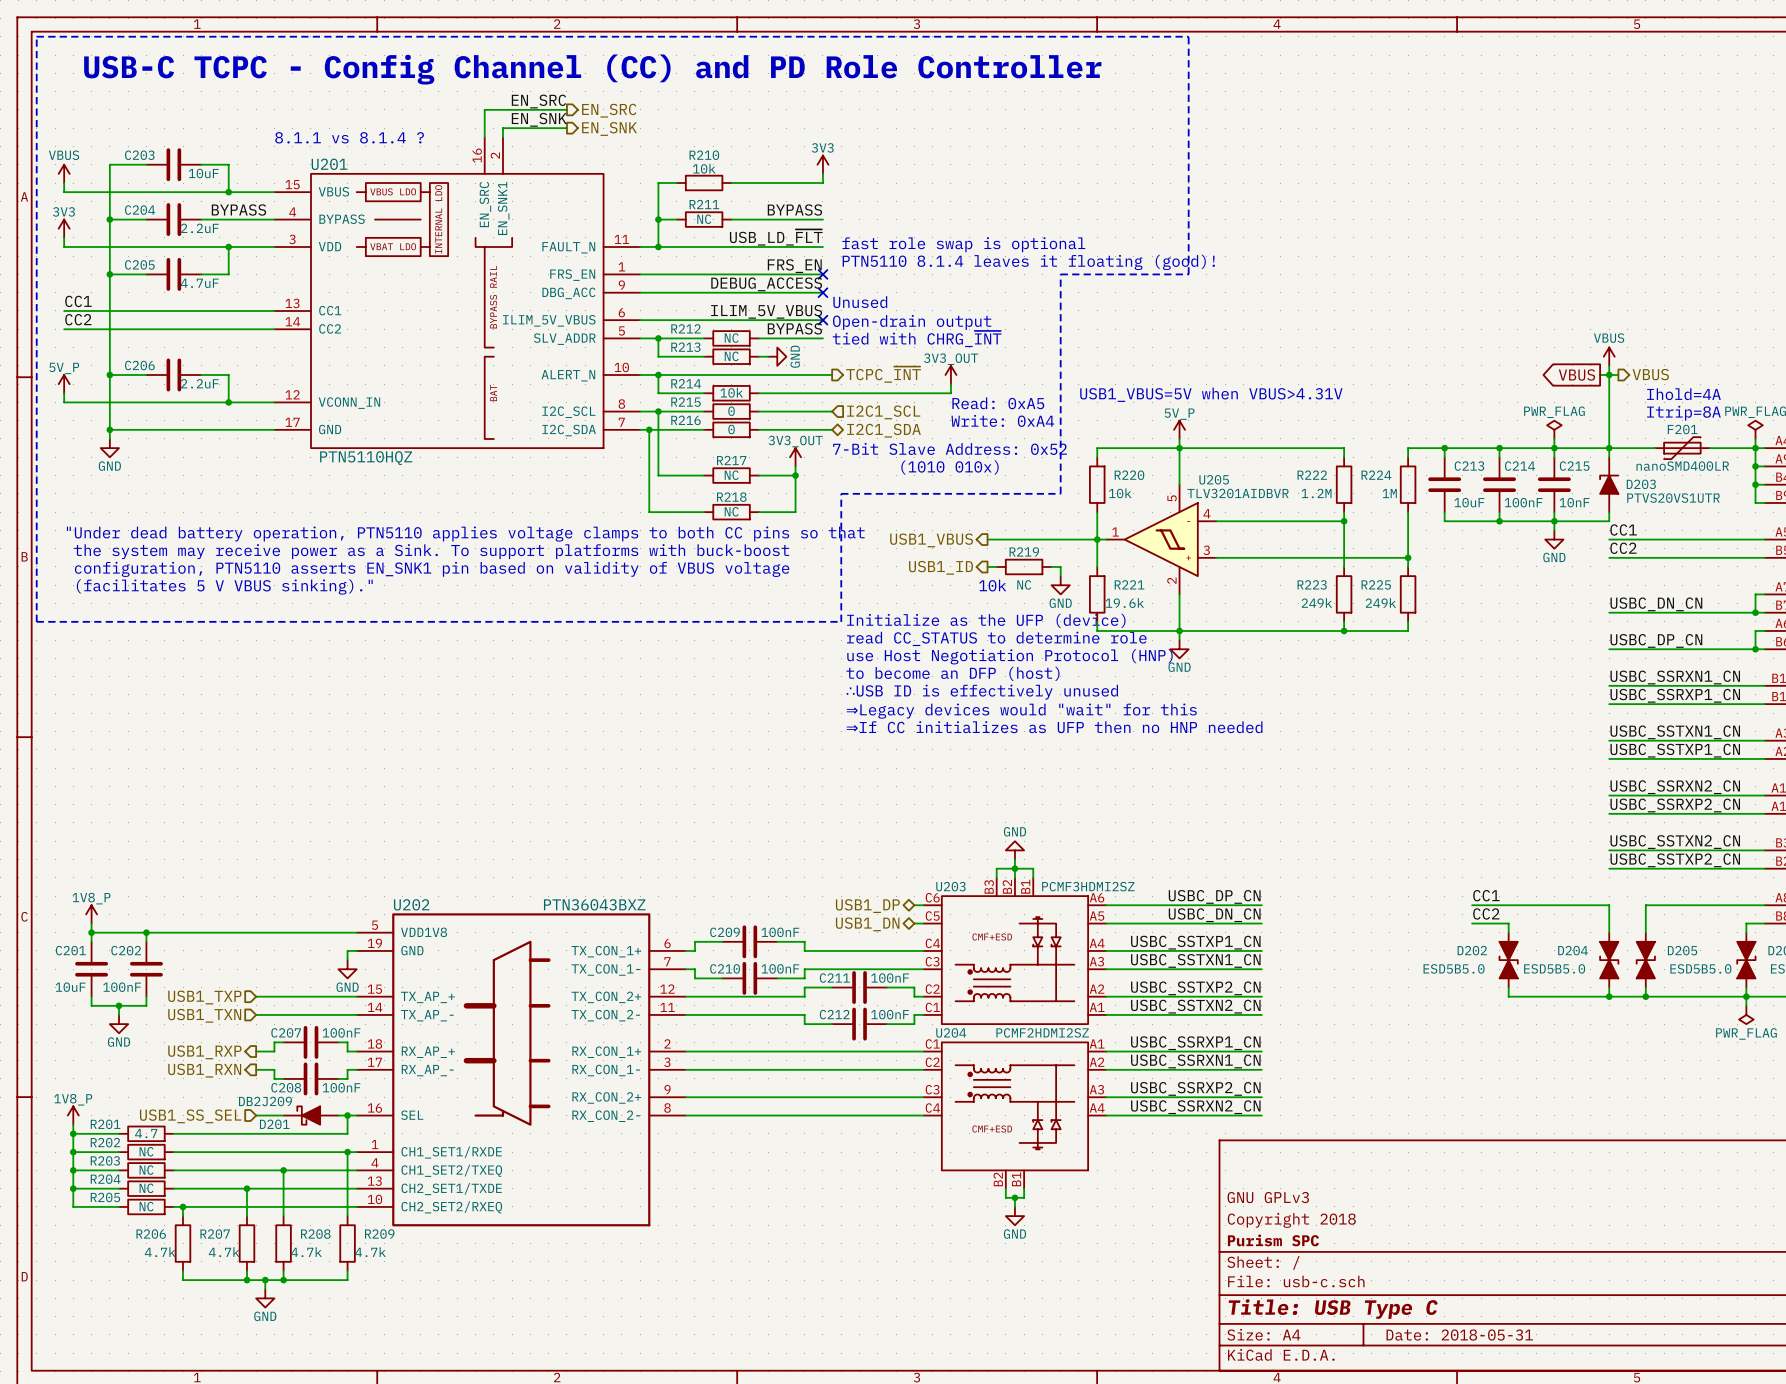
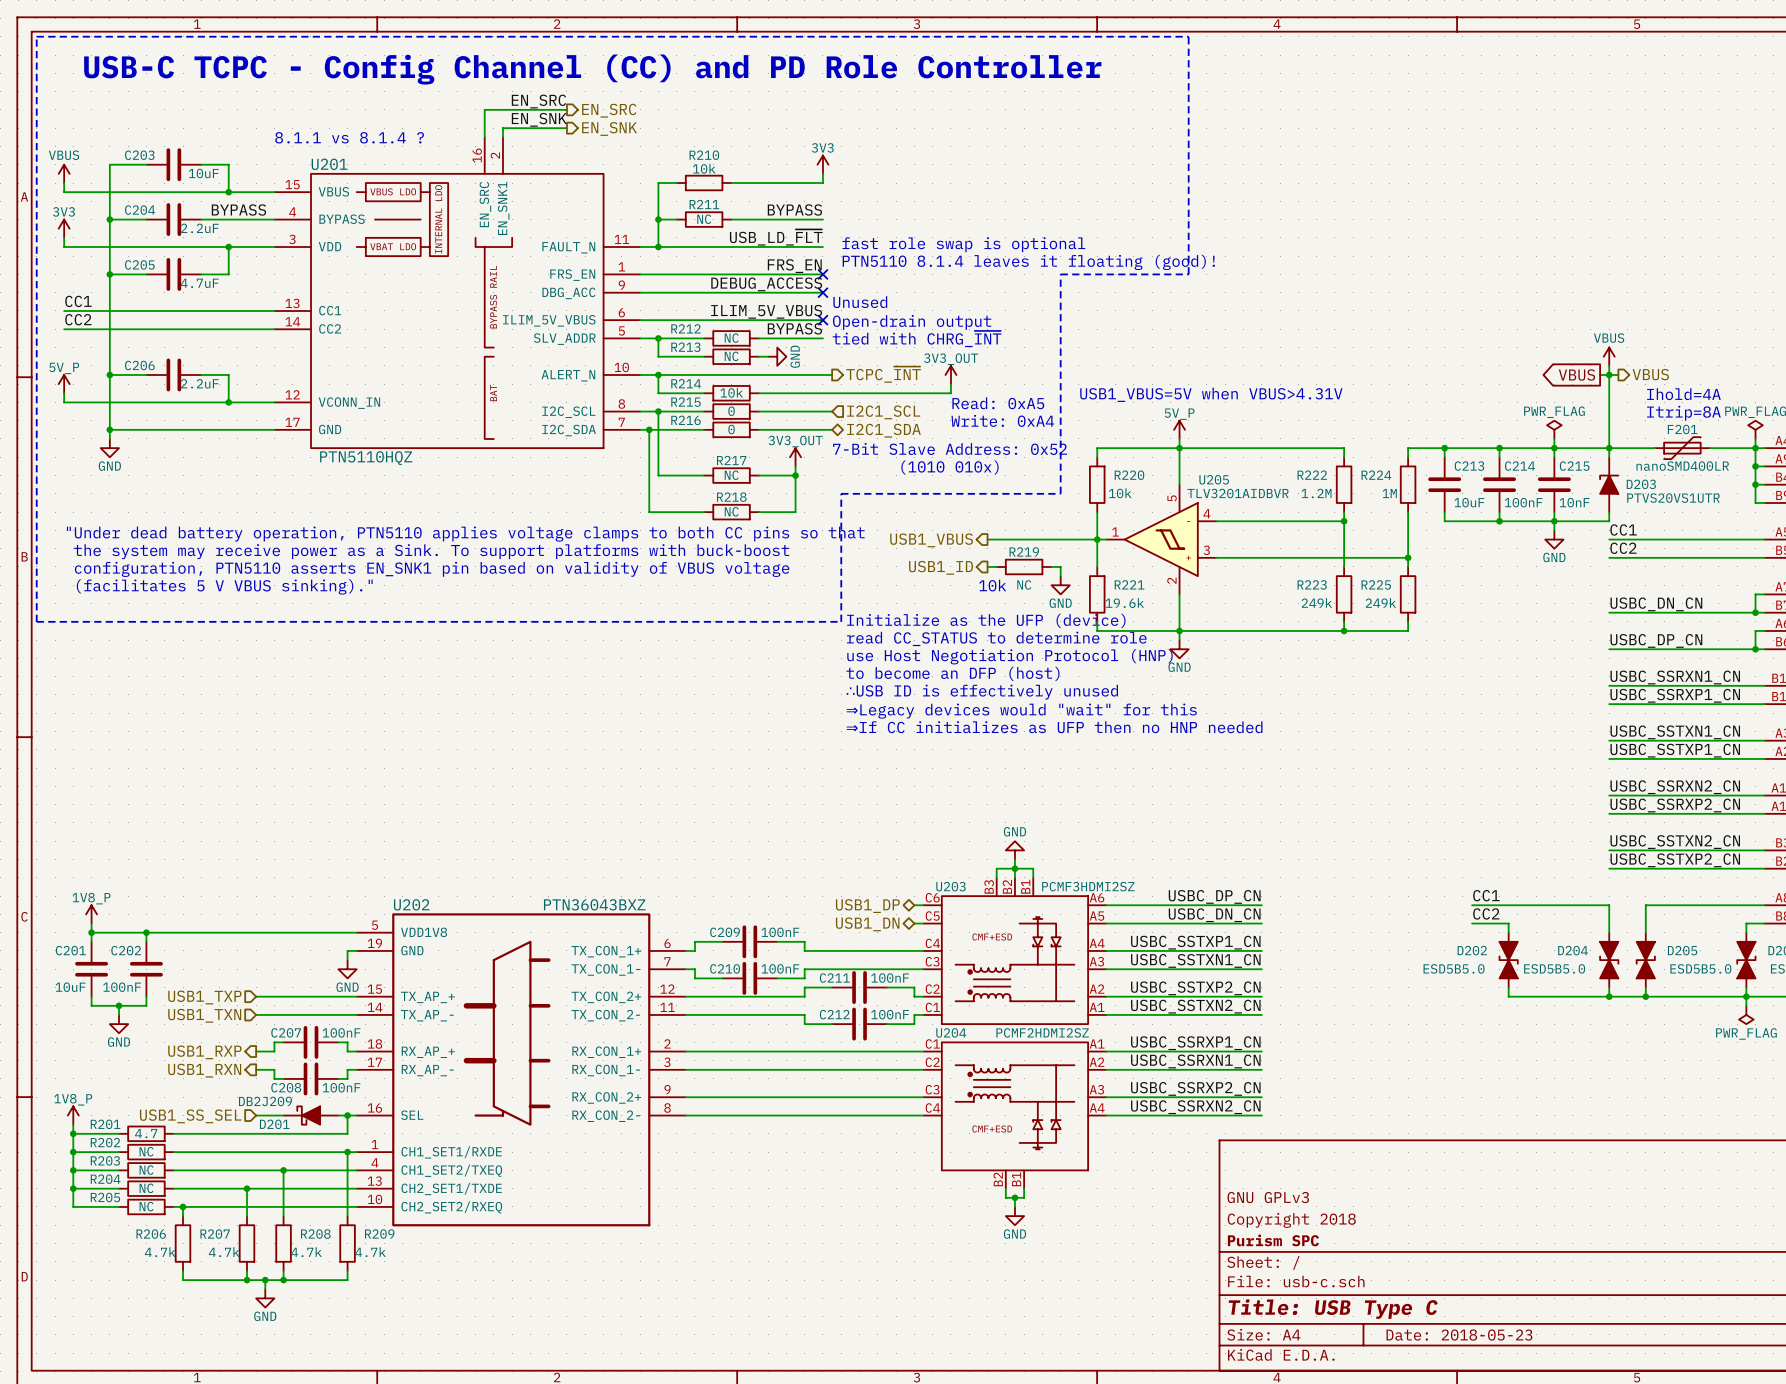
title block: Date: 2018-05-31 (1459, 1335) -> Date: 2018-05-23 (1459, 1335)

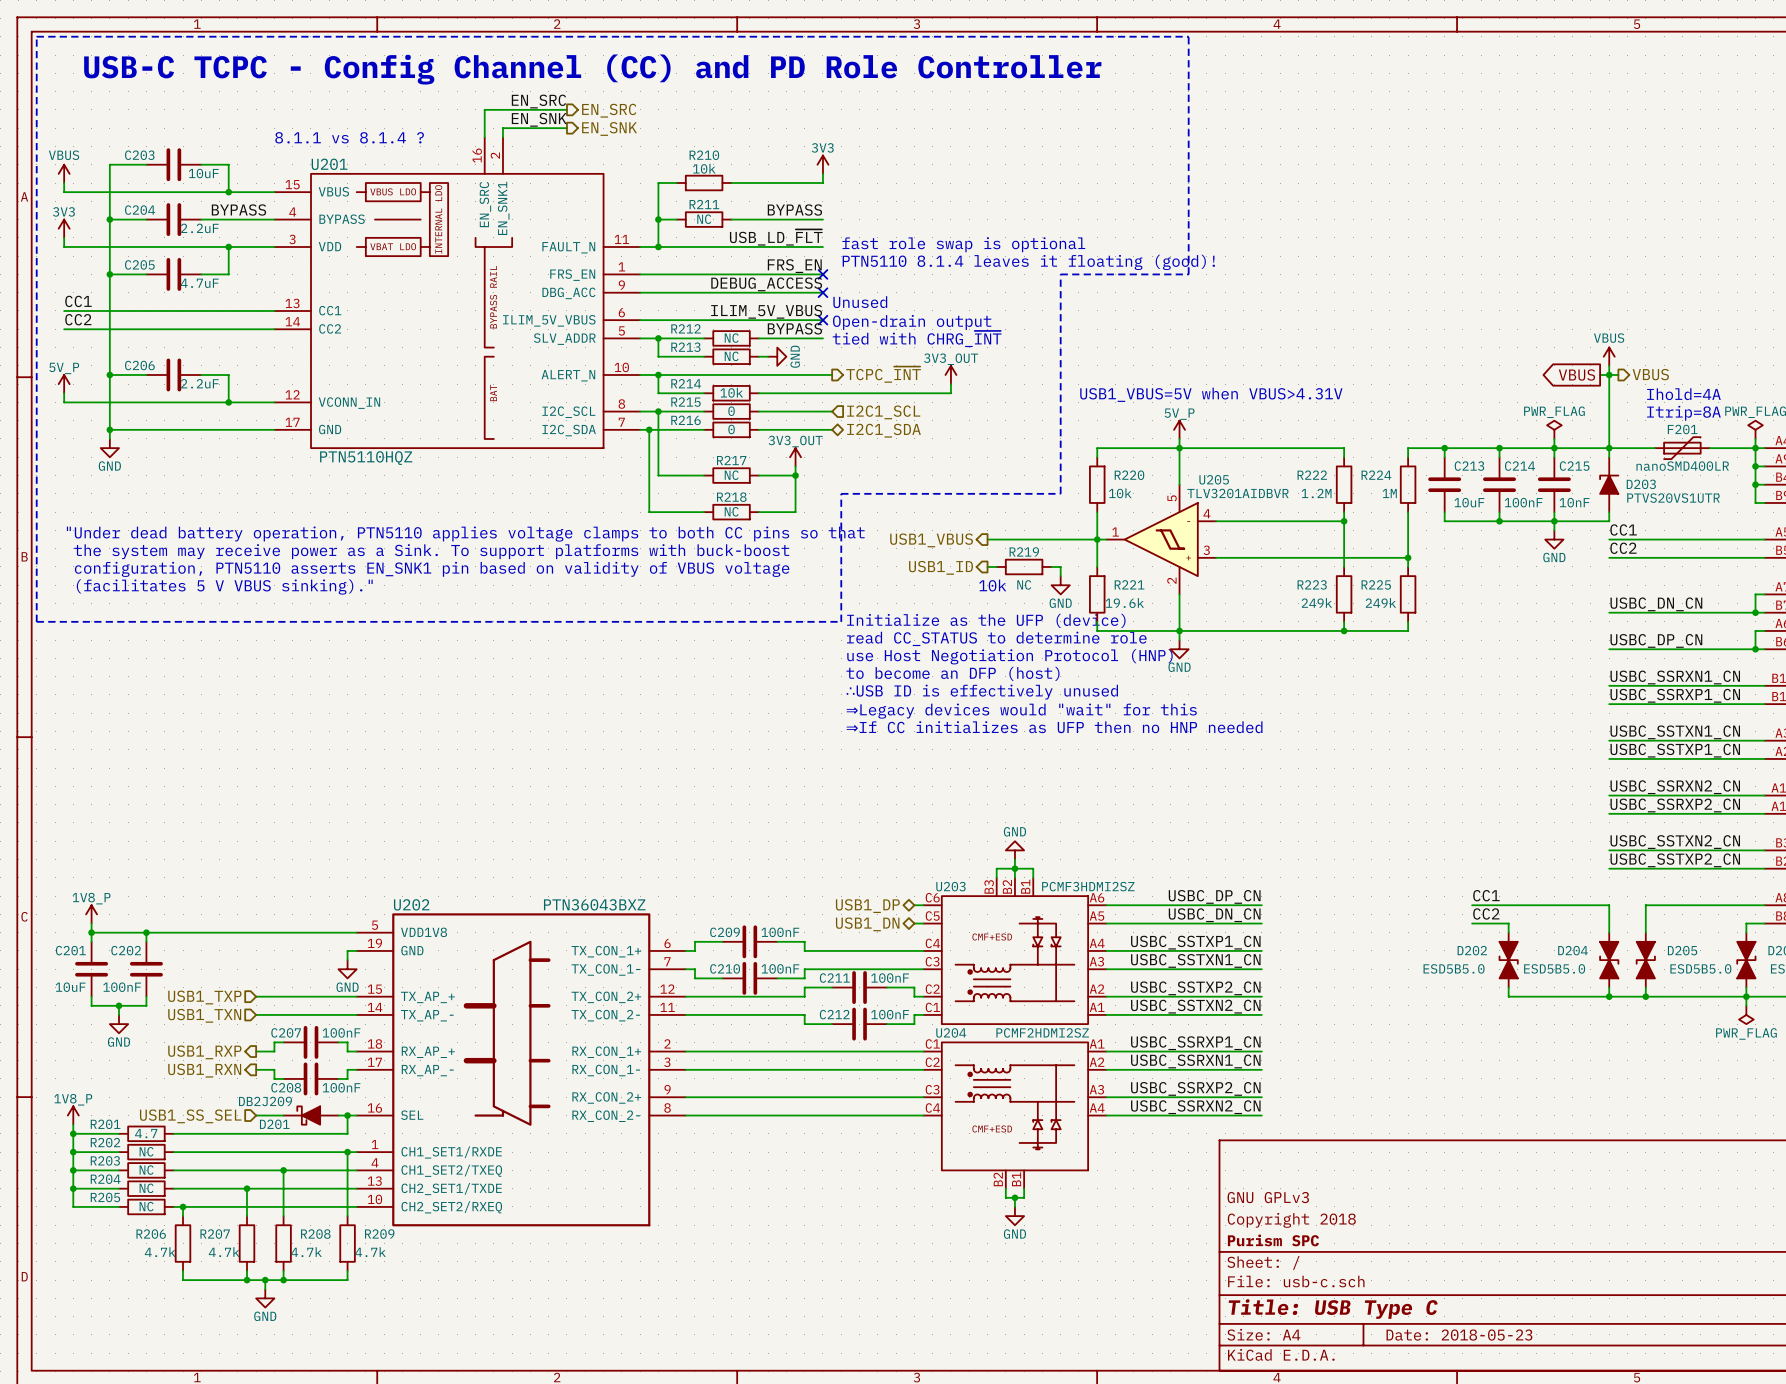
text: Read: 0xA5 (998, 403) -> none
text: Write: 0xA4 (1002, 420) -> none
text: 7-Bit Slave Address: 0x52 (950, 448) -> none
text: (1010 010x) (950, 467) -> none

